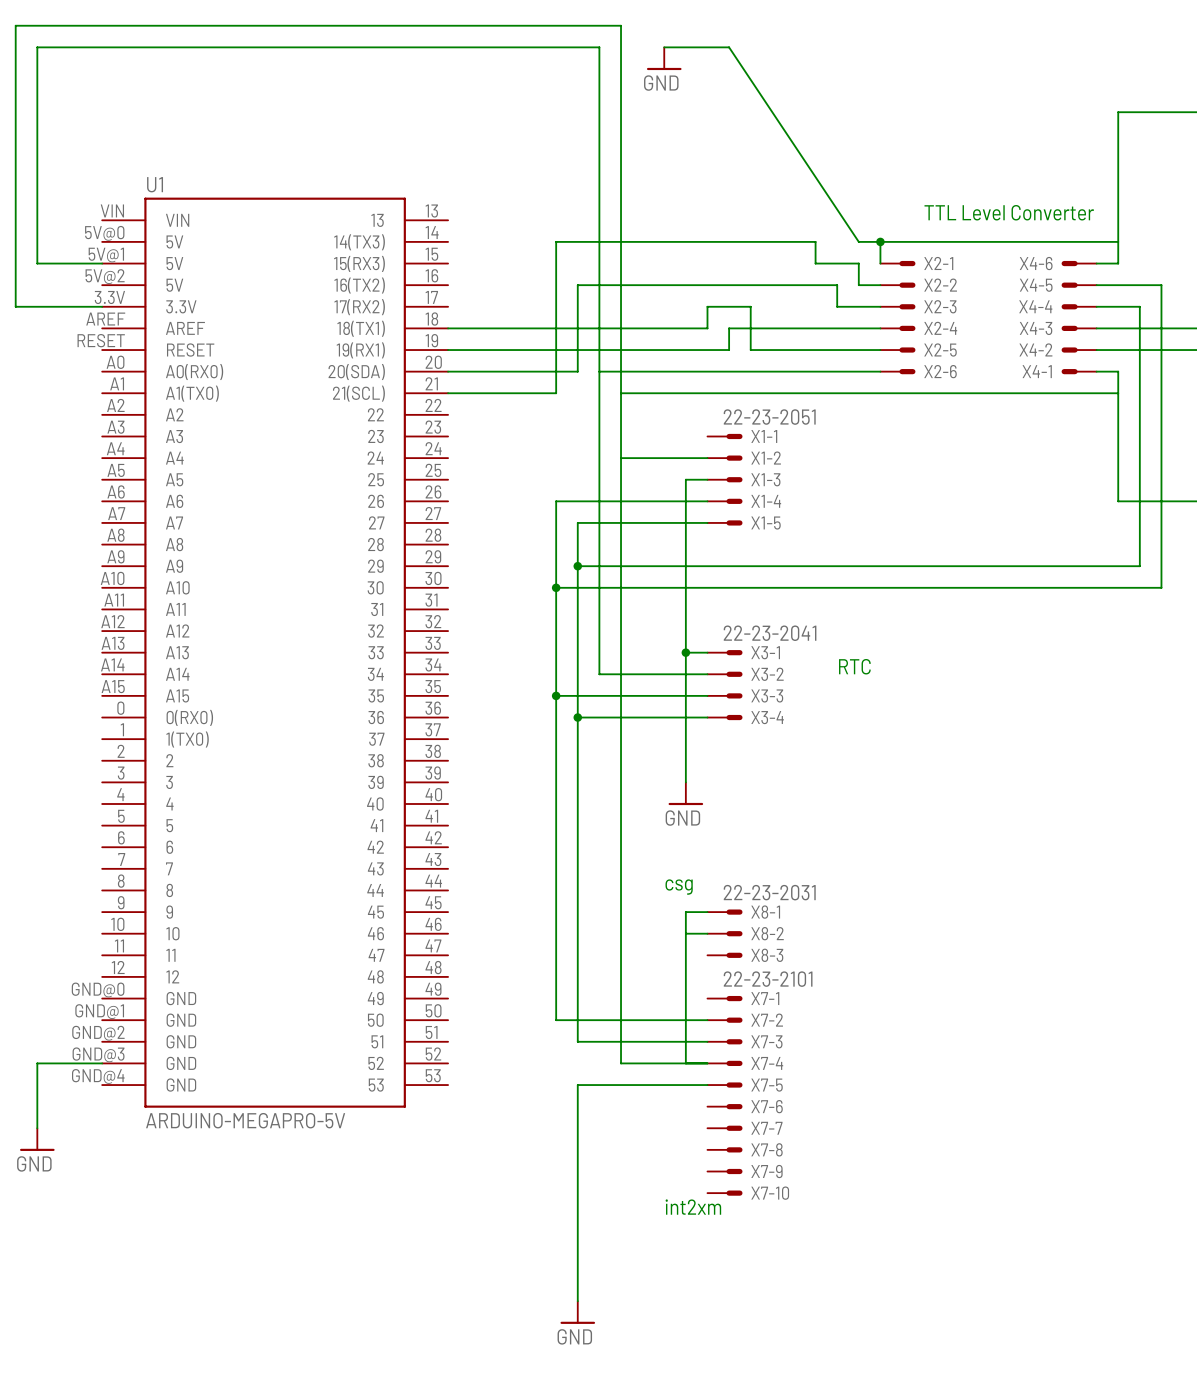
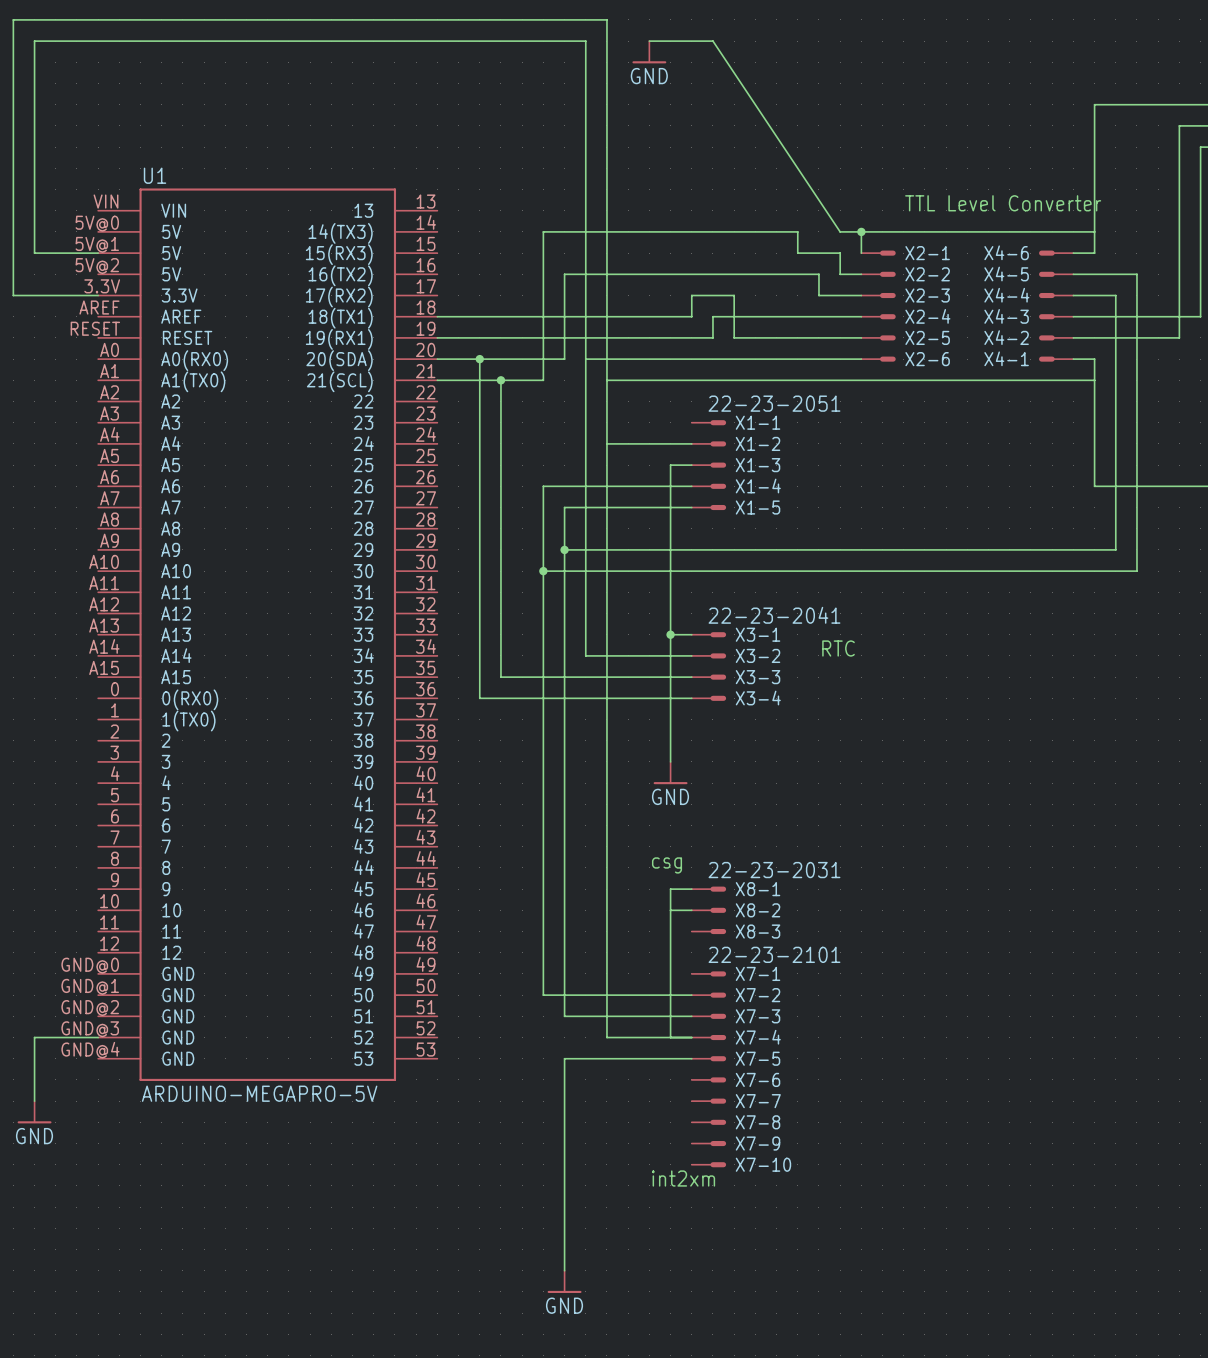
wire: none -> (479, 359) (479, 698) (564, 698)
junction: none -> (479, 359)
wire: none -> (500, 380) (500, 677) (543, 677)
junction: none -> (500, 380)
junction: (556, 695) -> none
junction: (577, 717) -> none

